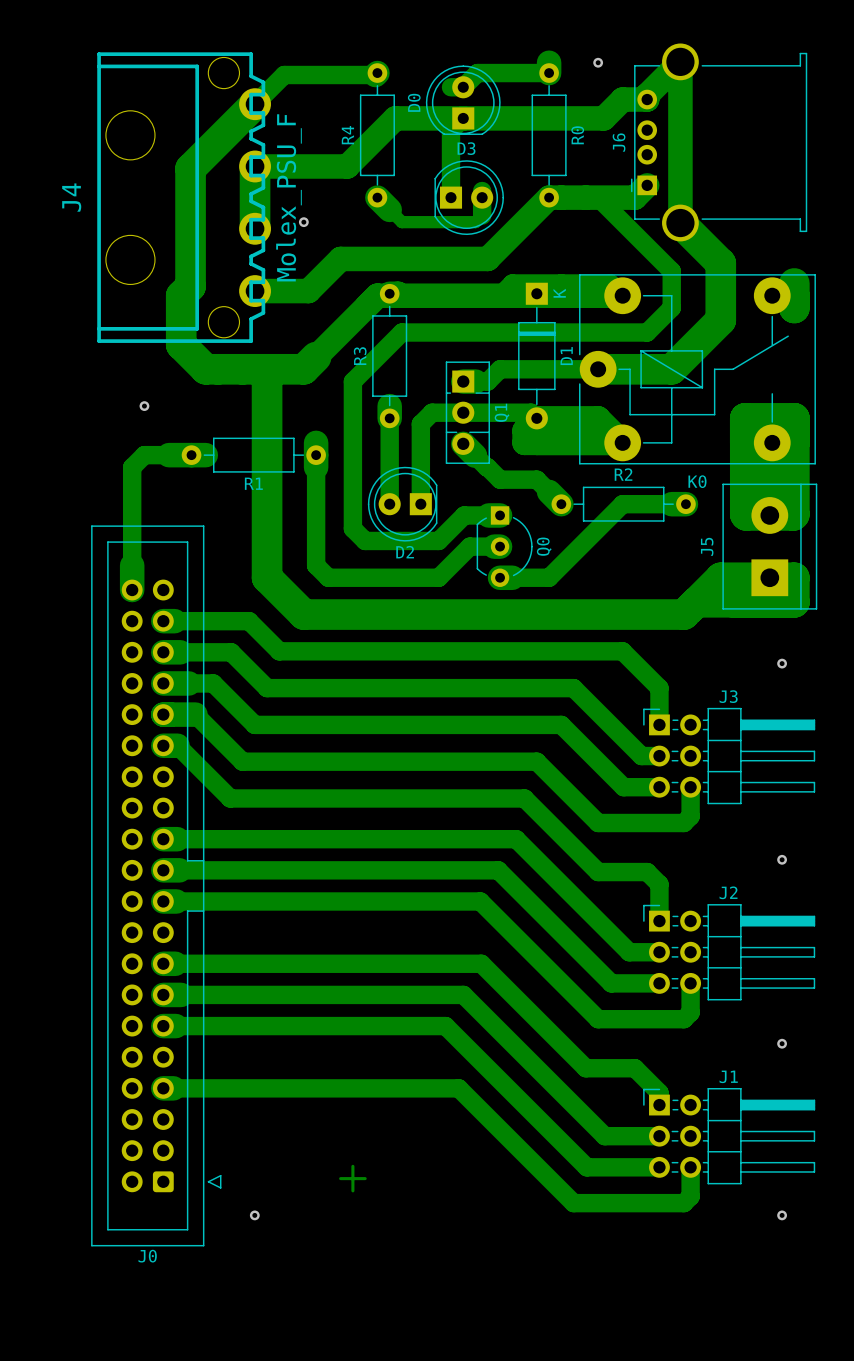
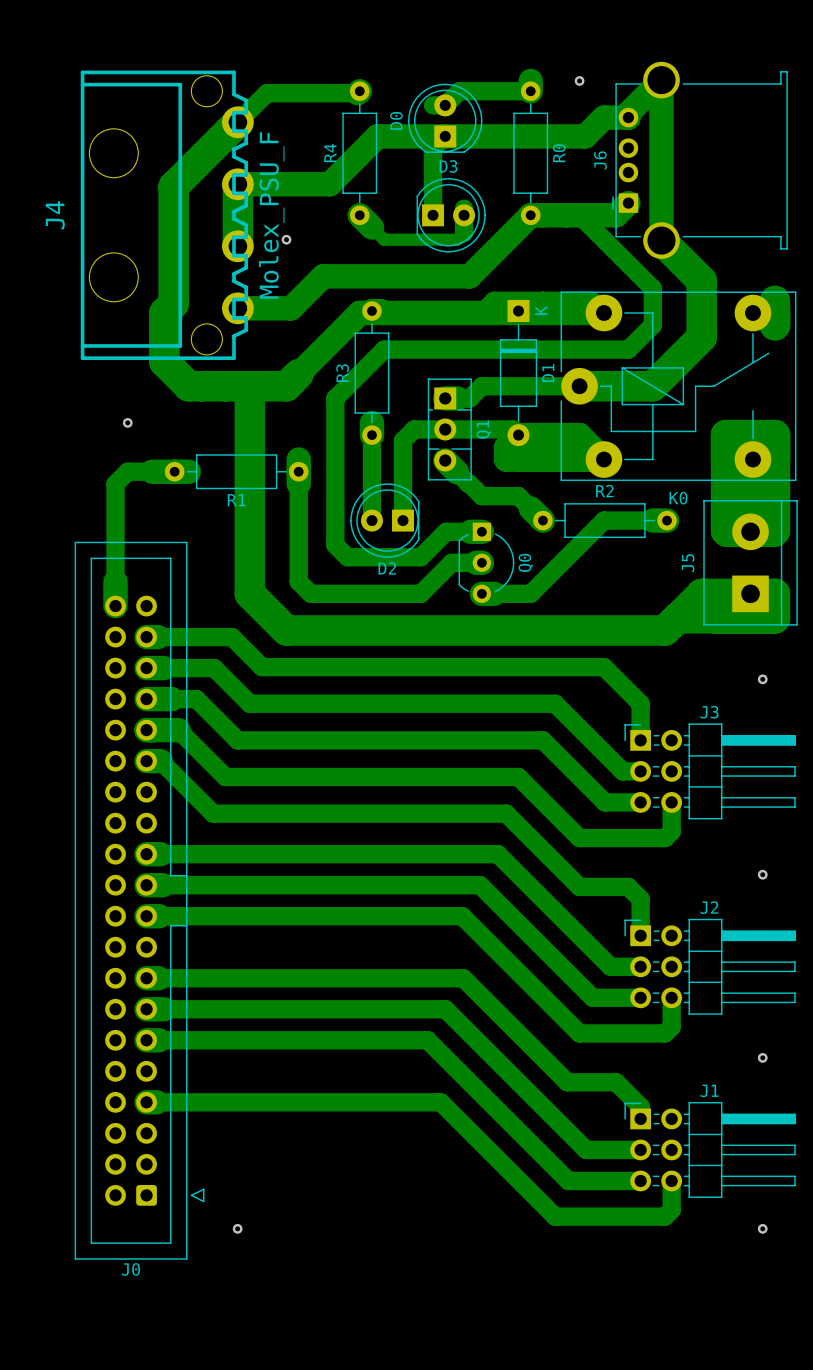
bottom track: (352, 1166) (352, 1190) -> none
bottom track: (340, 1178) (365, 1178) -> none

